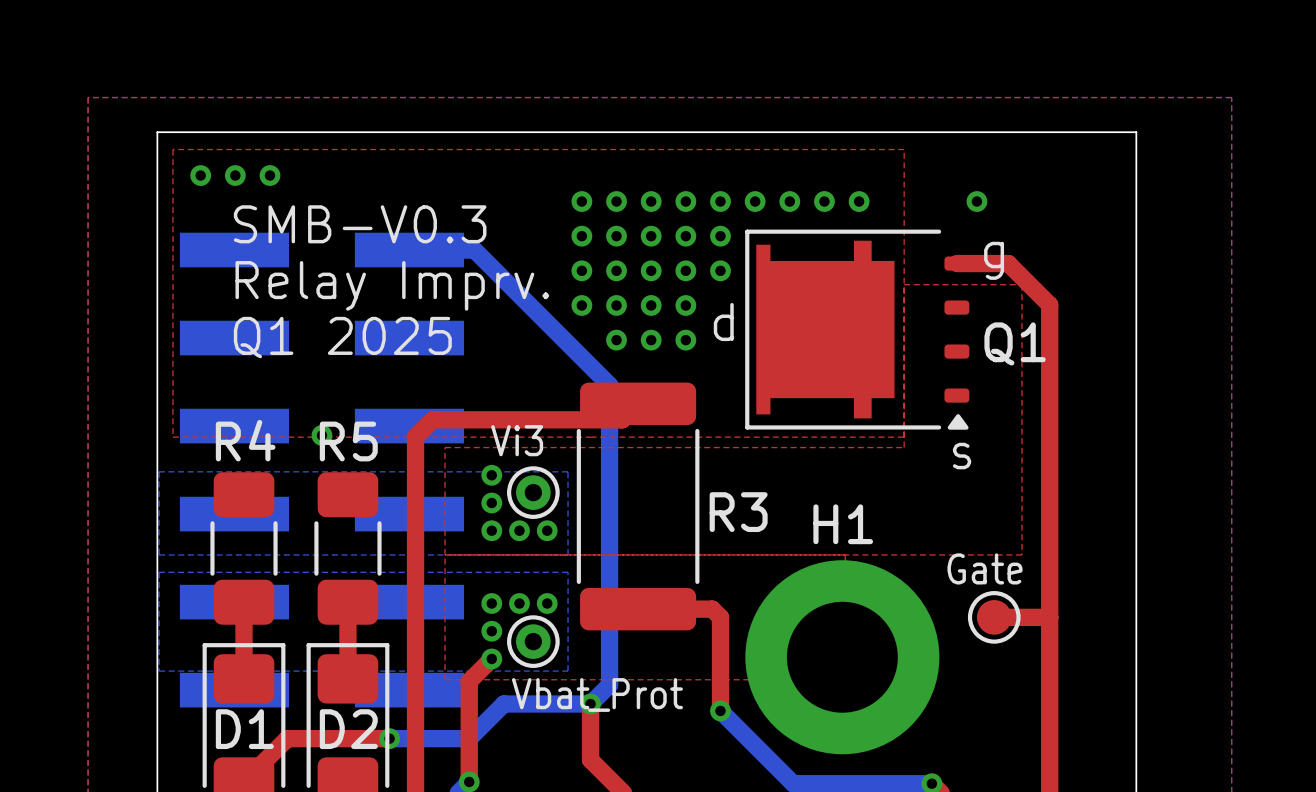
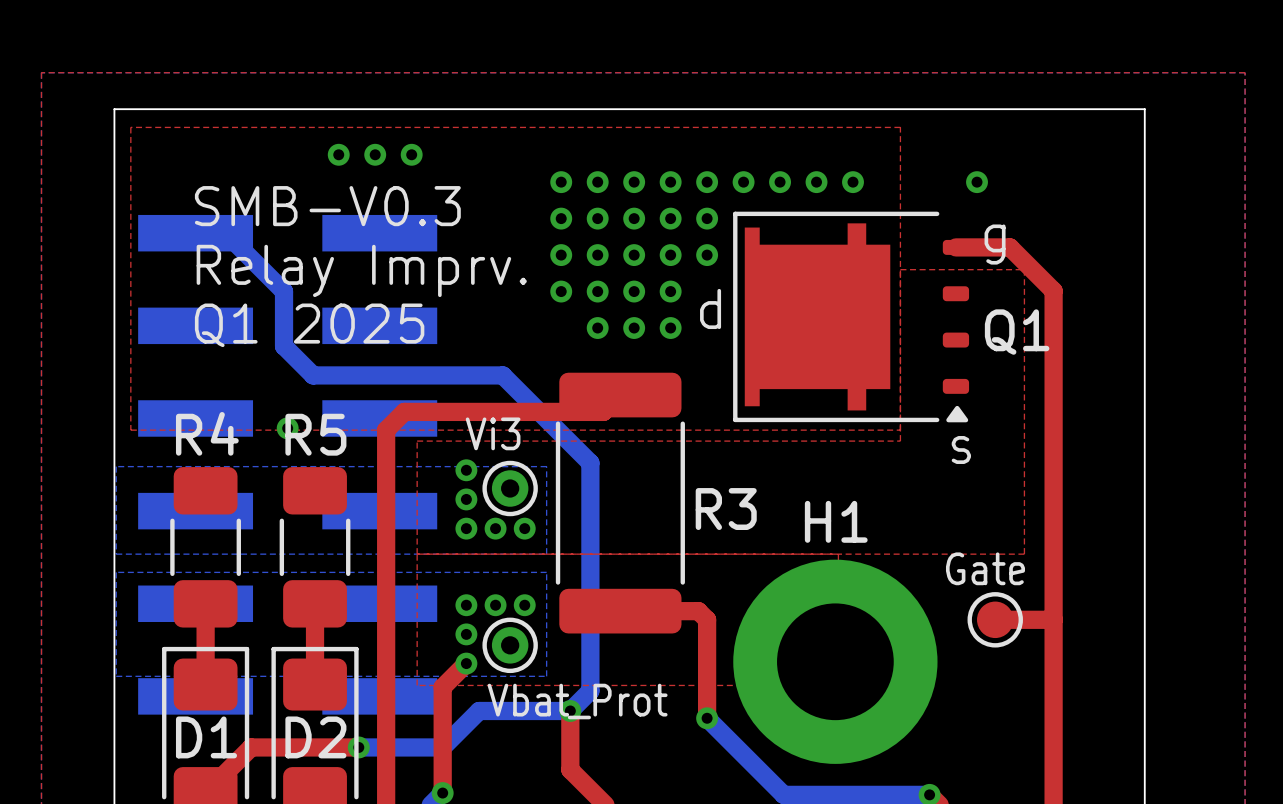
via: (200, 175) -> none
via: (235, 175) -> none
via: (269, 175) -> none
via: none -> (338, 154)
via: none -> (375, 154)
via: none -> (411, 154)
bottom track: (409, 250) (474, 250) (609, 385) (609, 468) -> (195, 233) (225, 233) (284, 291) (284, 346) (313, 375) (502, 375) (590, 462)

